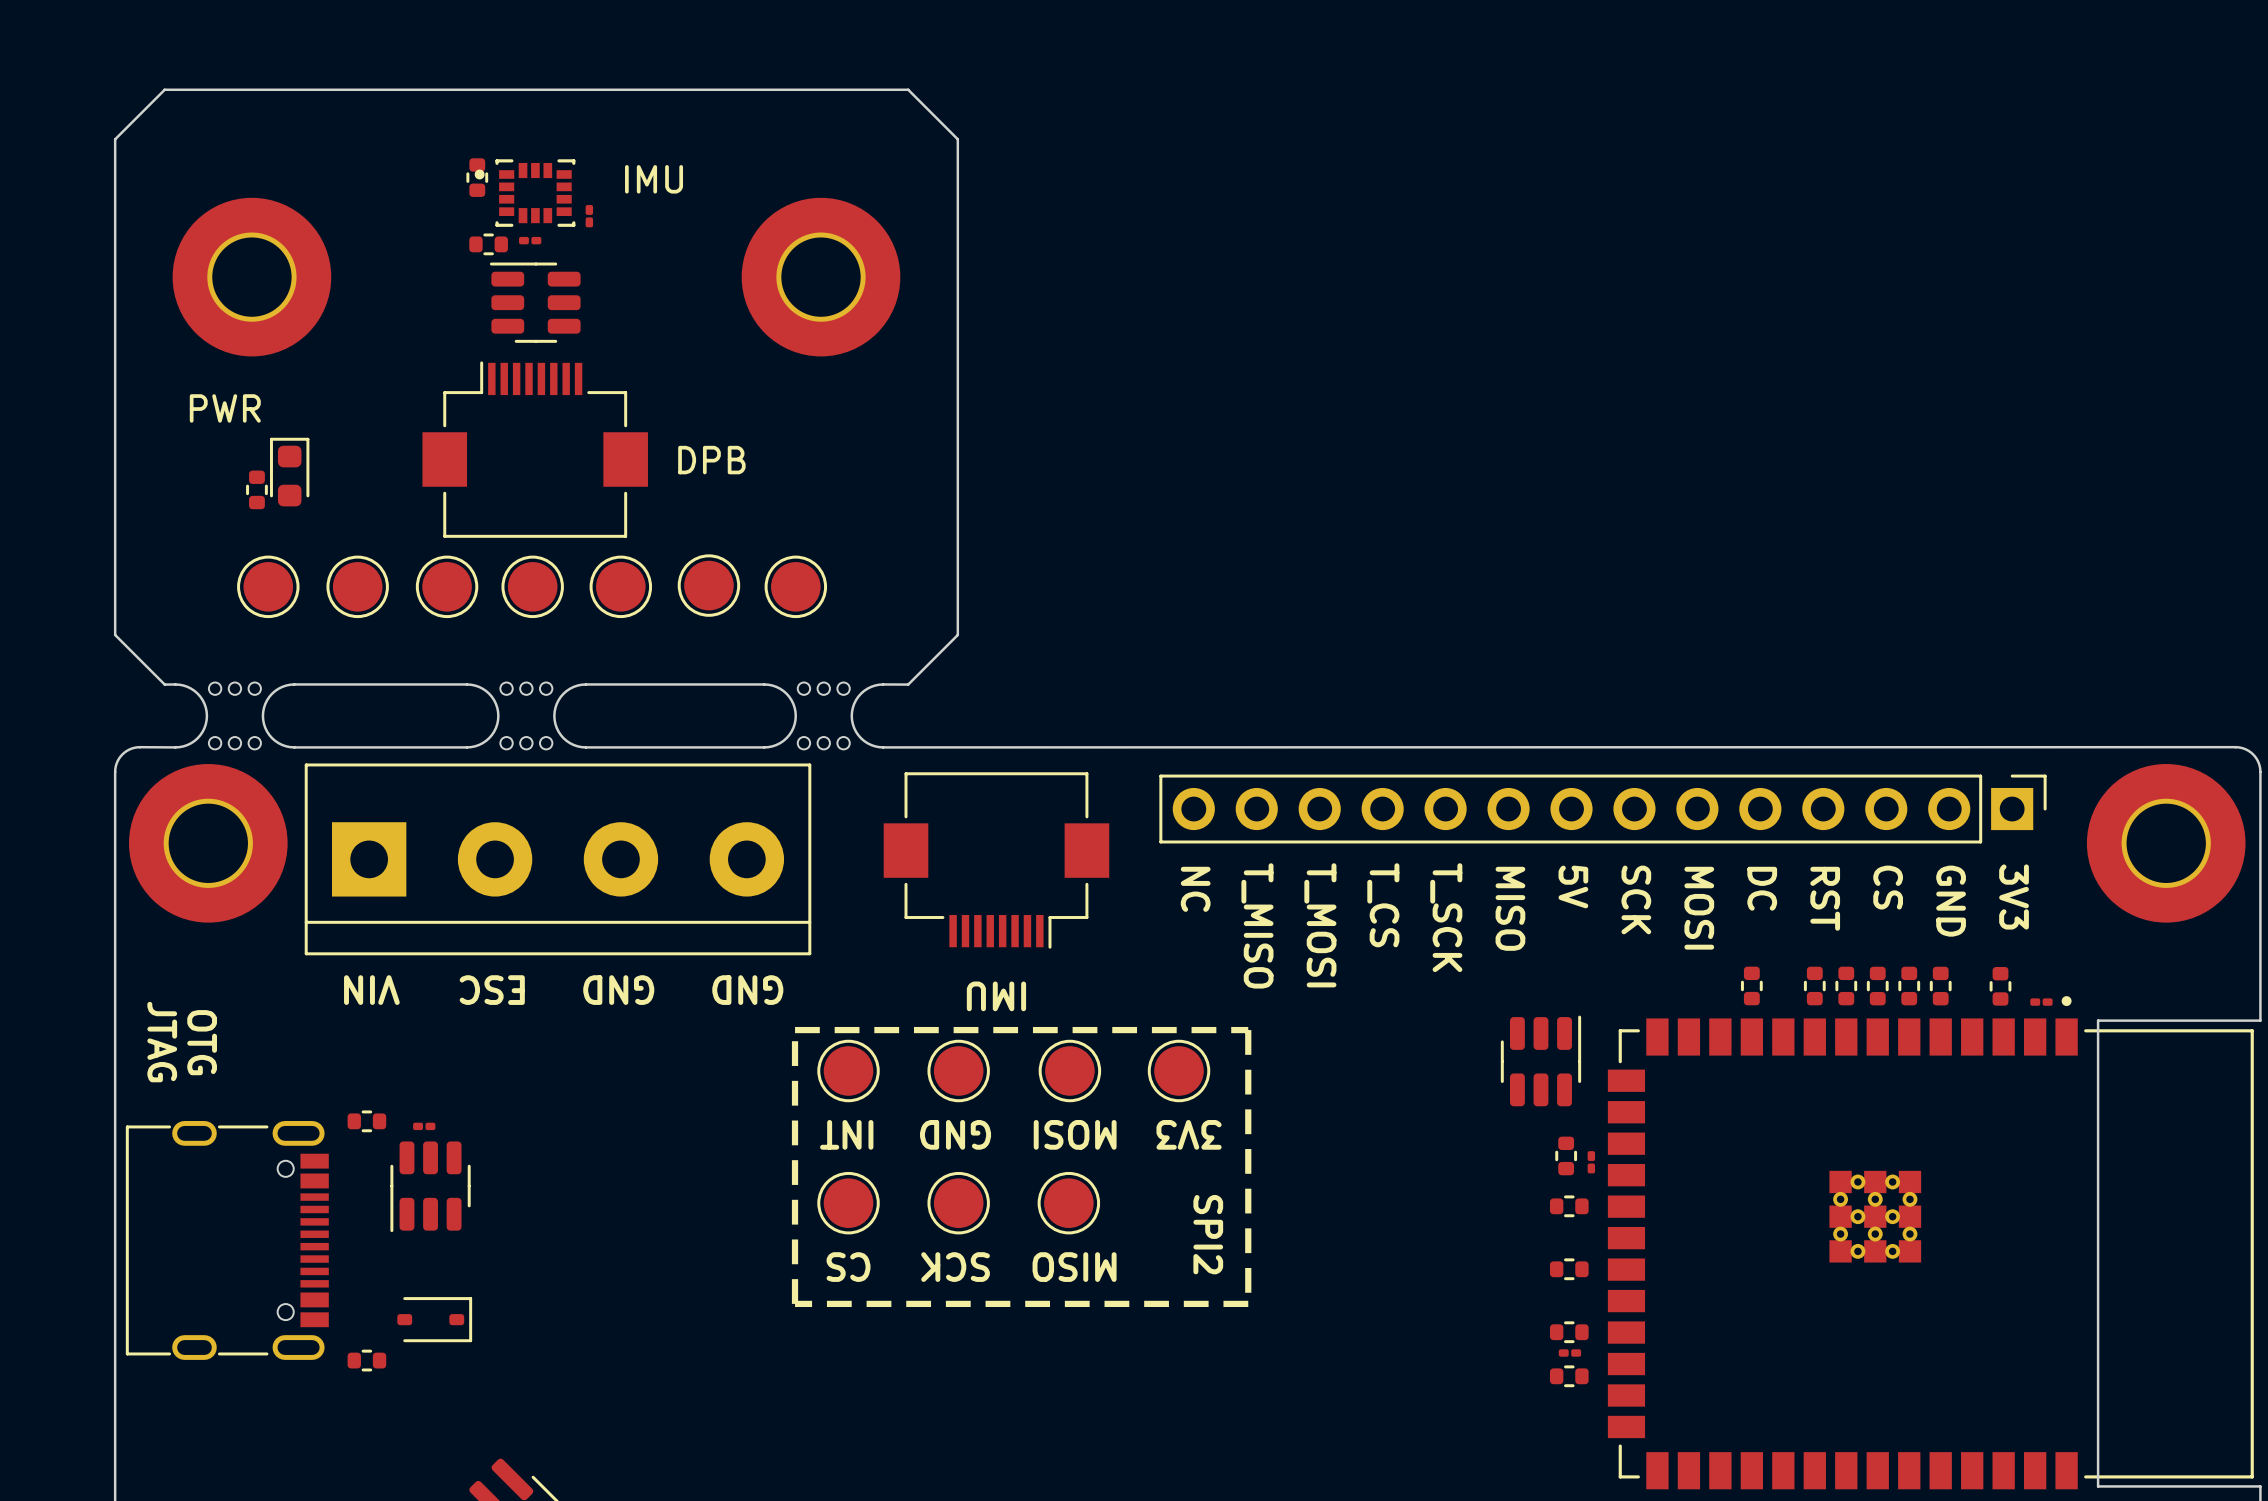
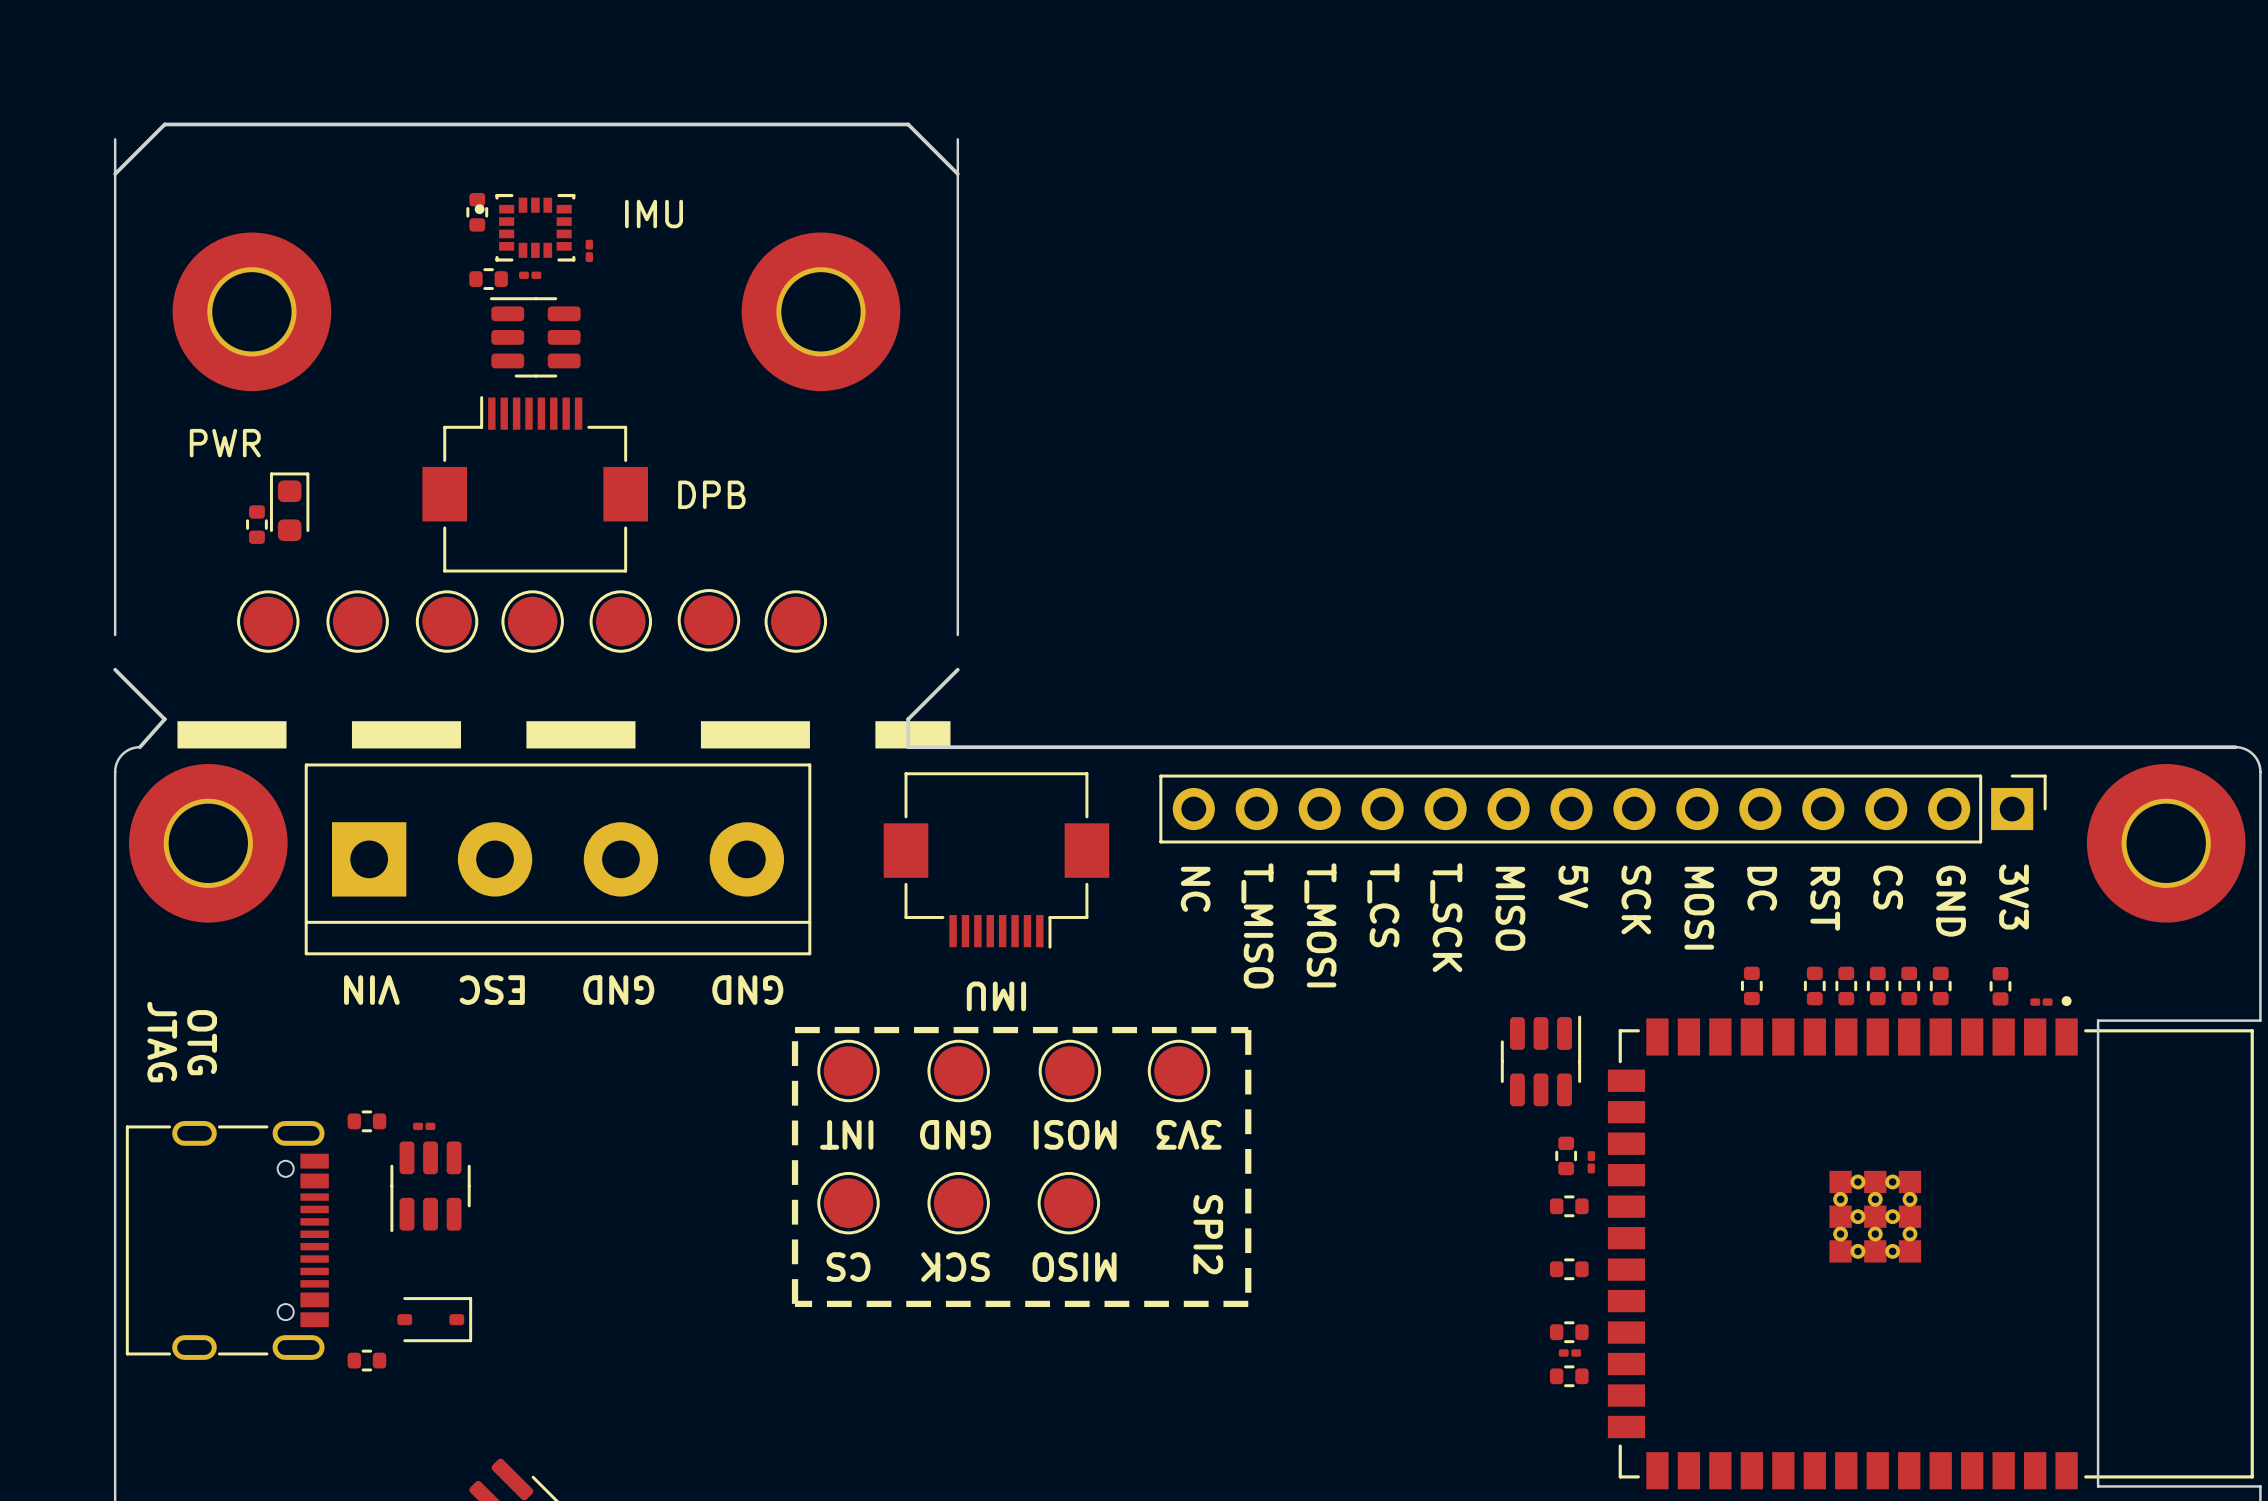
board edge: (115, 139) (164, 89) (908, 89) (957, 139) -> (115, 174) (164, 124) (908, 124) (957, 174)
part: (477, 177) -> none
text position: IMU (654, 179) -> IMU (654, 214)
part: (525, 193) -> none
part: none -> (477, 212)
part position: (589, 216) -> (589, 250)
part footprint: [519, 236, 542, 245] -> [474, 193, 576, 262]
part: (488, 244) -> none
part: none -> (530, 275)
part position: (251, 277) -> (251, 311)
part position: (821, 277) -> (820, 311)
part: none -> (488, 279)
part position: (535, 302) -> (535, 337)
text position: PWR (225, 408) -> PWR (225, 443)
part position: (535, 449) -> (535, 484)
text position: DPB (711, 460) -> DPB (711, 494)
part position: (289, 472) -> (289, 506)
part position: (256, 489) -> (256, 524)
part position: (708, 585) -> (708, 620)
part position: (268, 586) -> (268, 621)
part position: (357, 586) -> (357, 621)
part position: (447, 586) -> (447, 621)
part position: (532, 586) -> (532, 621)
part position: (620, 586) -> (620, 621)
part position: (795, 586) -> (795, 621)
board edge: (115, 634) (164, 684) (175, 684) -> none
board edge: (957, 634) (908, 684) (883, 684) -> none
board edge: (294, 684) (466, 684) -> none
board edge: (585, 684) (764, 684) -> none
part: (234, 715) -> none
part: (526, 715) -> none
part: (823, 715) -> none
line: none -> (177, 734) (950, 734)
board edge: (139, 747) (175, 747) -> (139, 747) (164, 719) (115, 669)
board edge: (294, 747) (466, 747) -> none
board edge: (585, 747) (764, 747) -> none
board edge: (2235, 747) (883, 747) -> (2235, 747) (908, 747) (908, 719) (957, 669)

